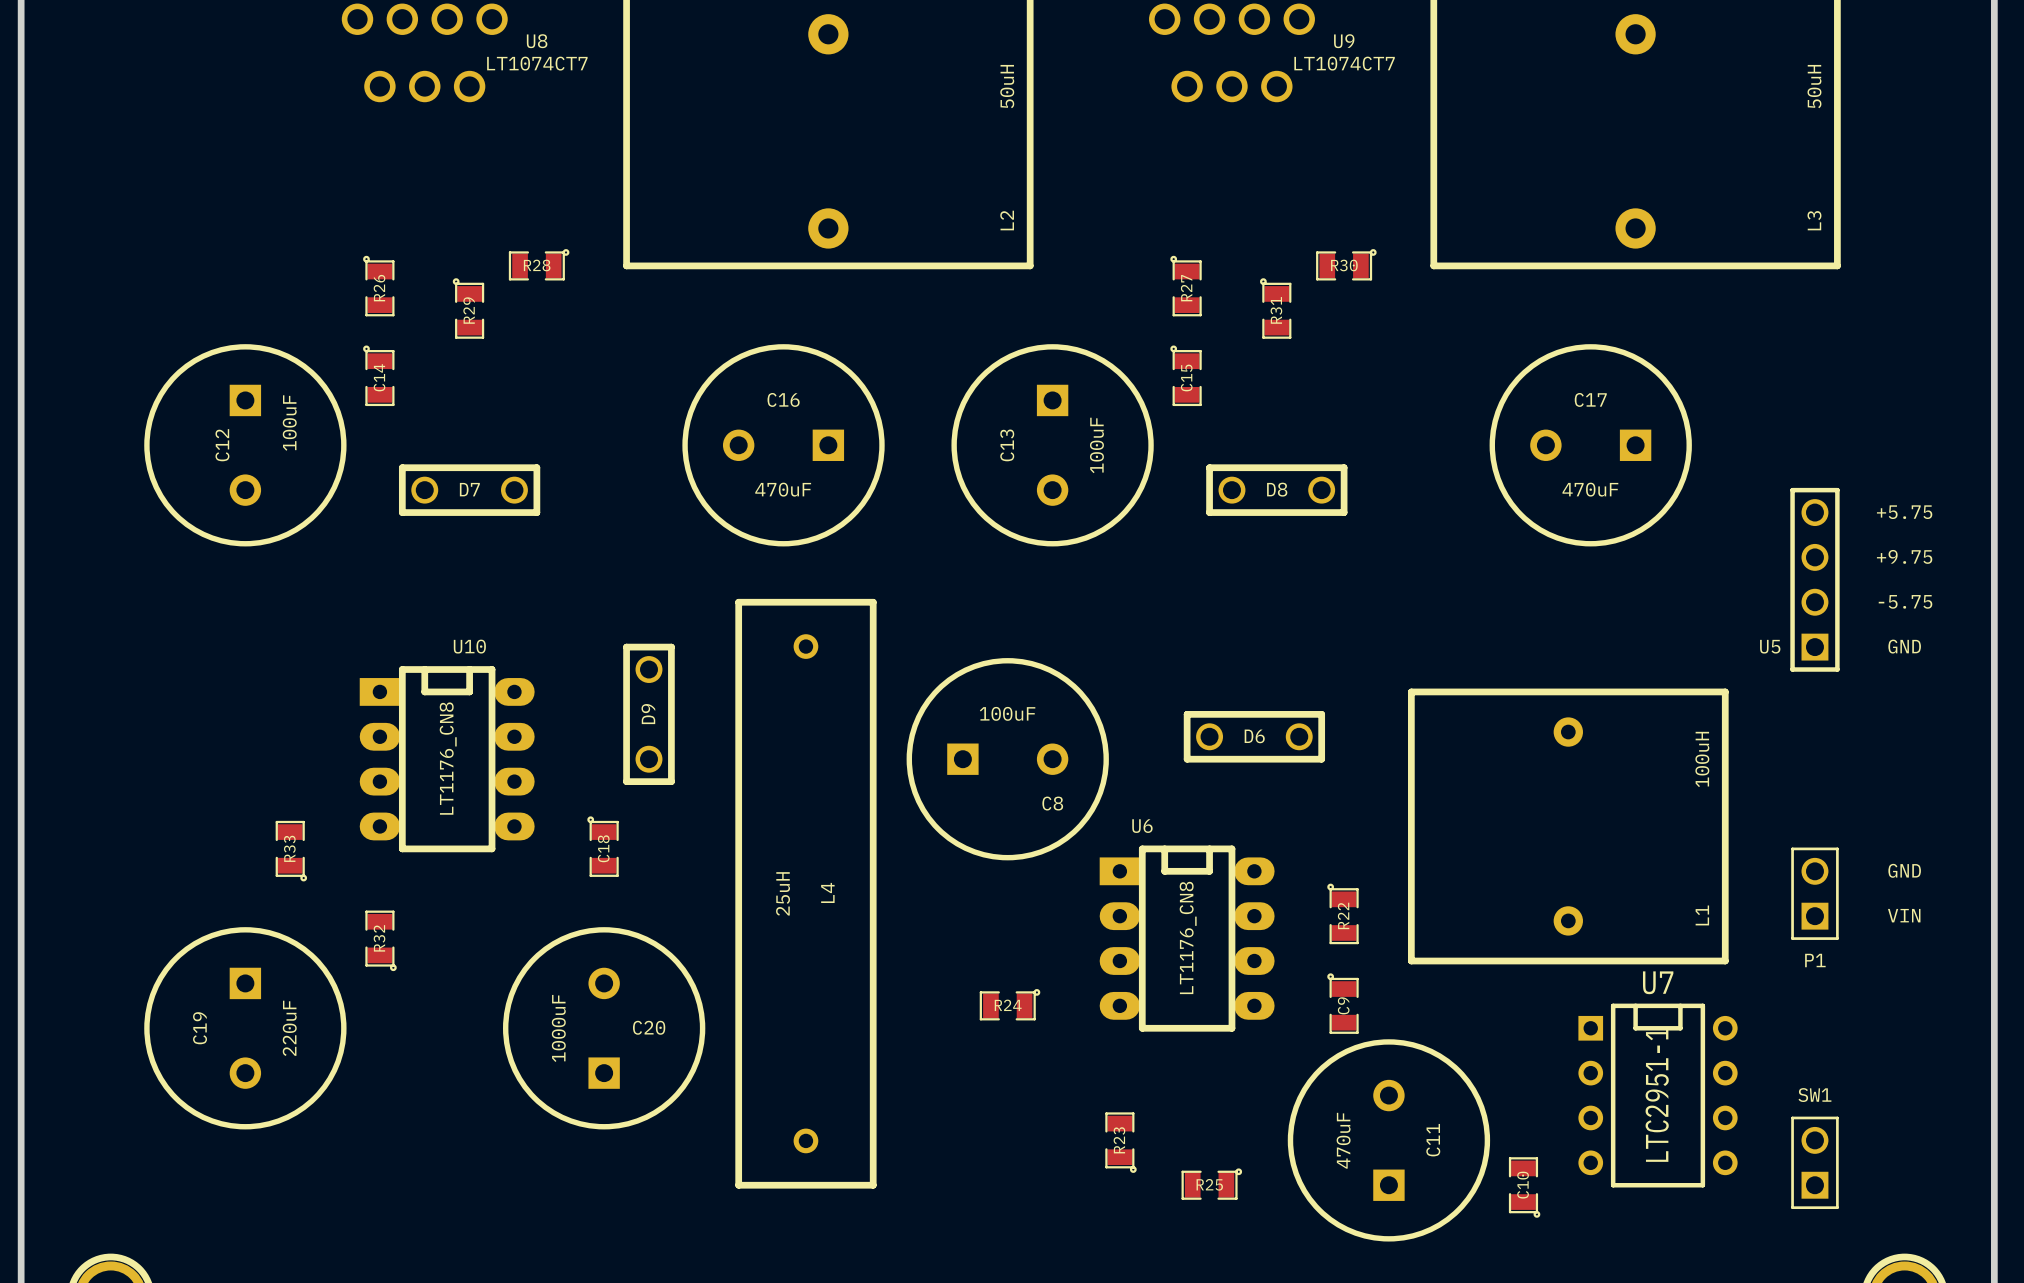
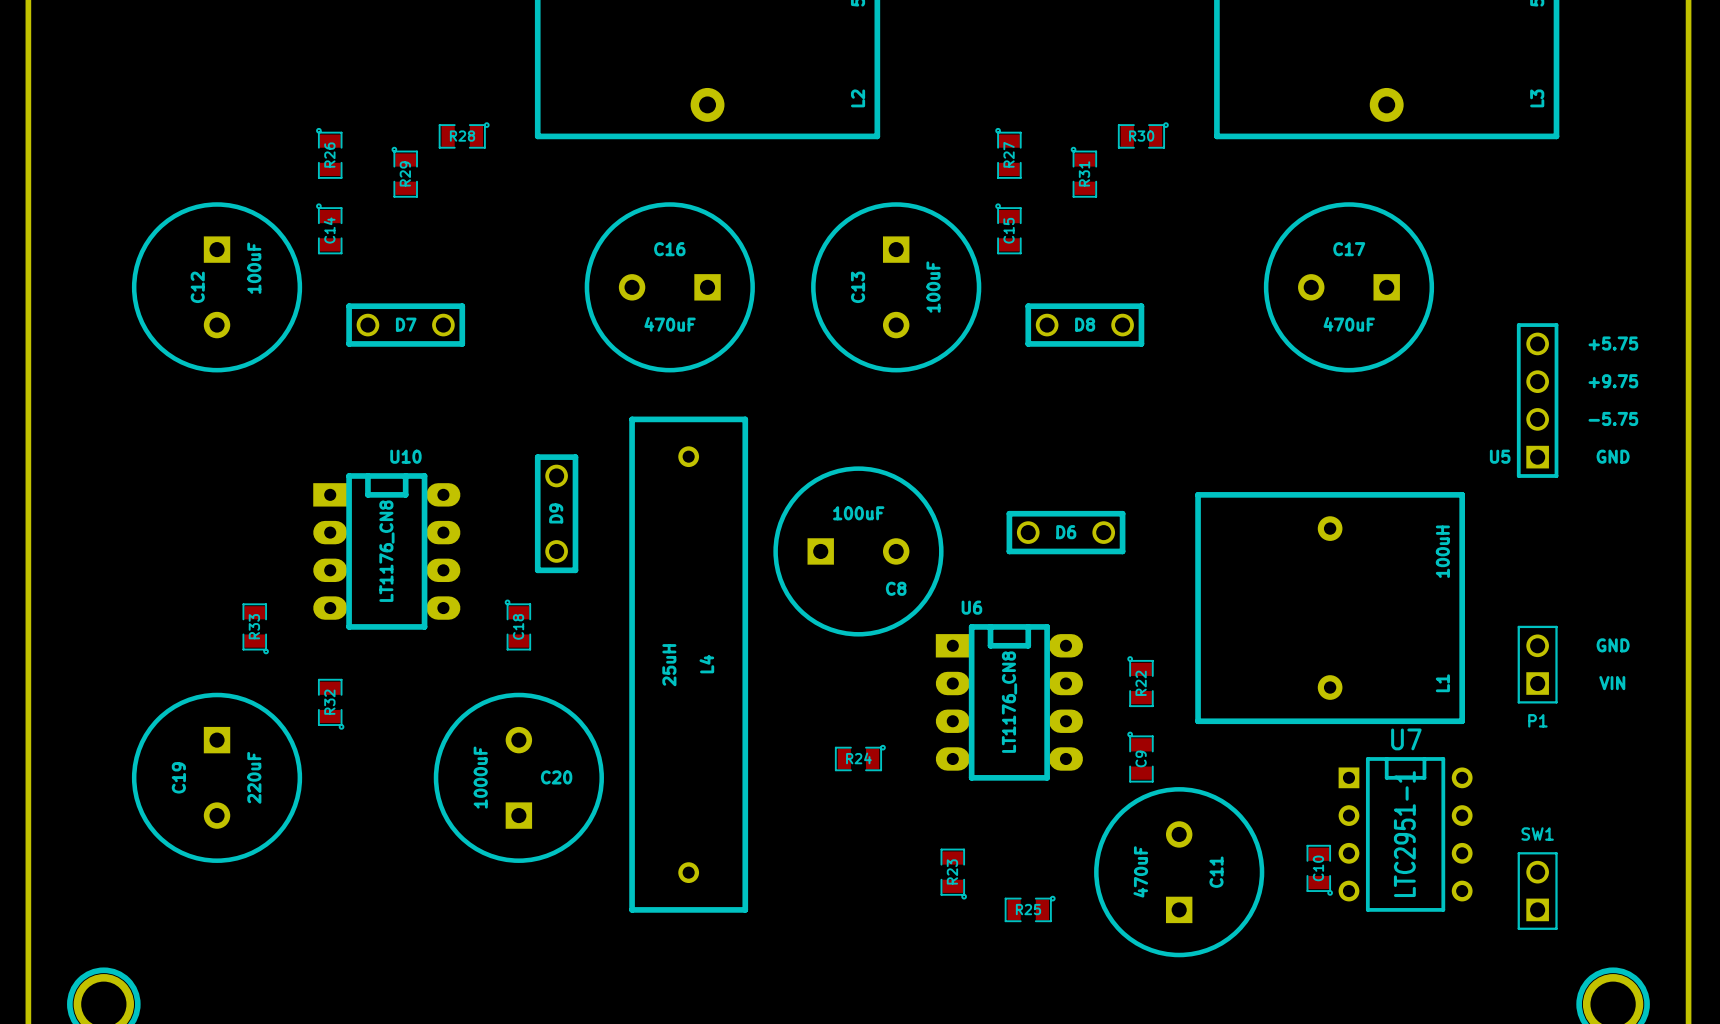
C10 position: (1524, 1187) -> (1319, 870)

